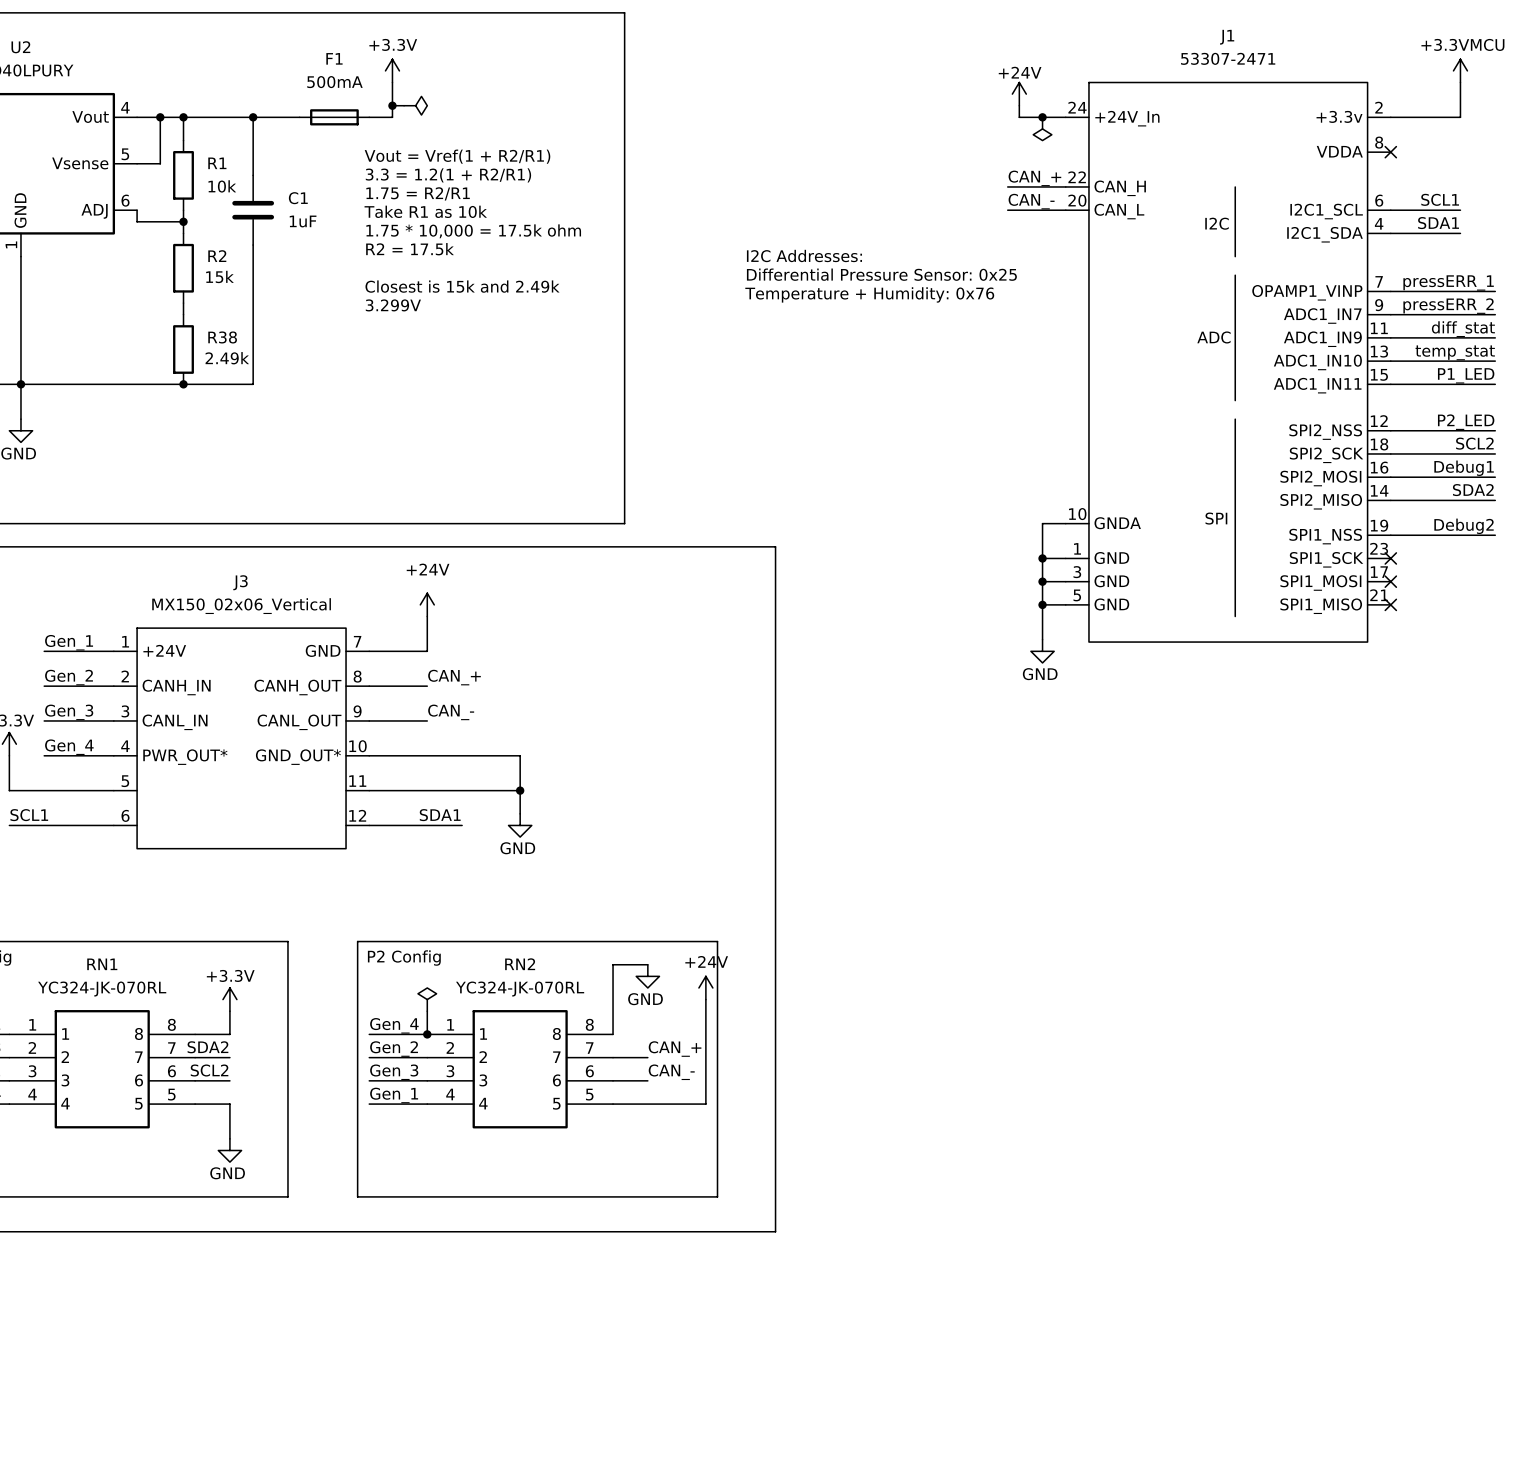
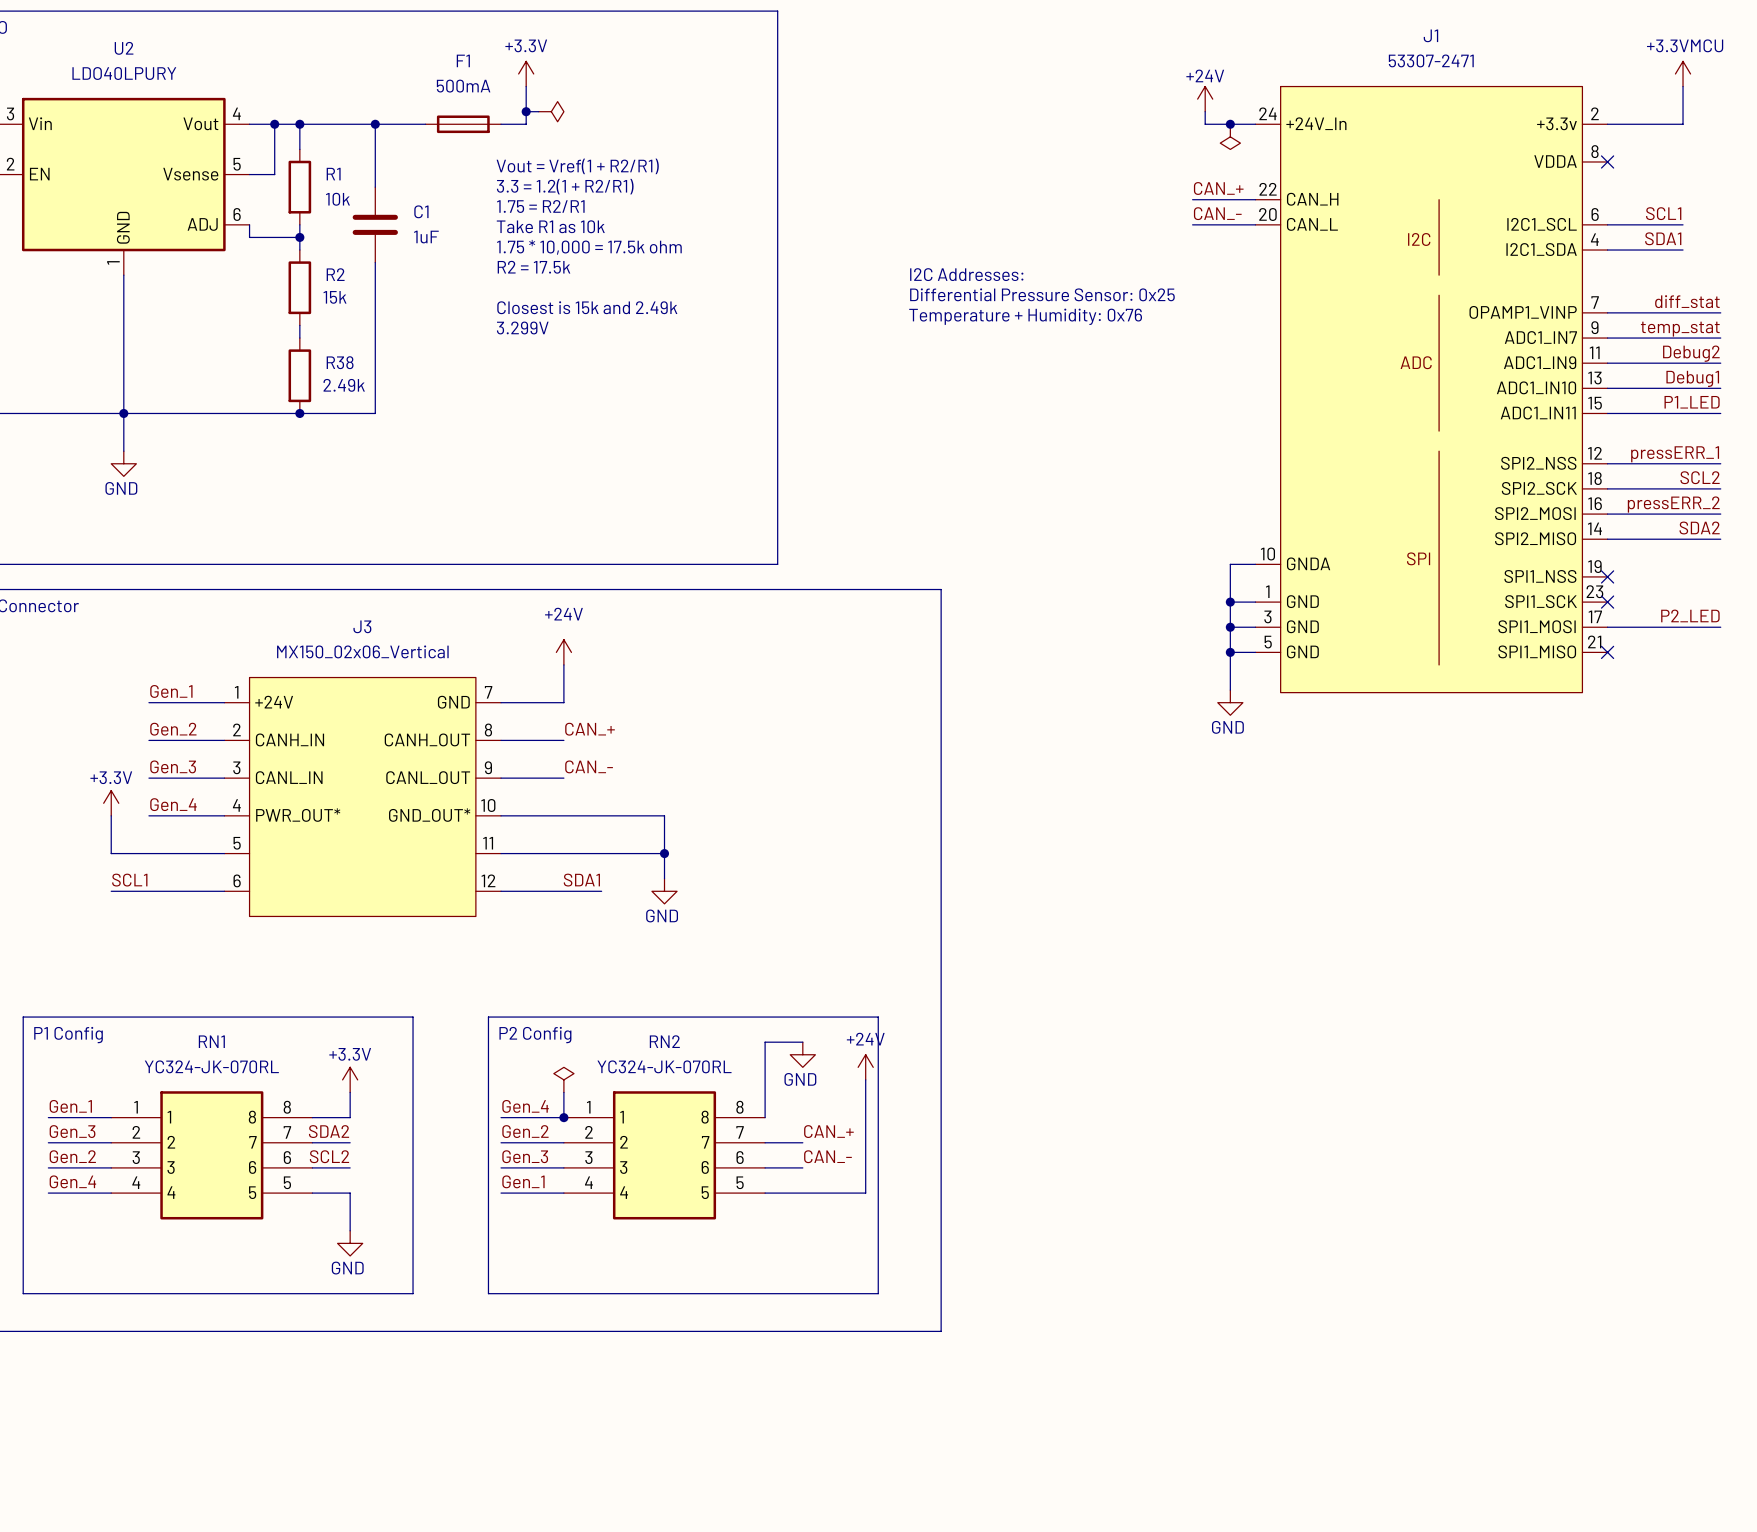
label: pressERR_1 (1448, 282) -> diff_stat (1687, 301)
label: pressERR_2 (1448, 306) -> temp_stat (1680, 329)
label: diff_stat (1463, 329) -> Debug2 (1691, 353)
label: temp_stat (1455, 352) -> Debug1 (1692, 378)
label: P2_LED (1466, 422) -> pressERR_1 (1675, 454)
label: Debug1 (1464, 468) -> pressERR_2 (1673, 504)
label: Debug2 (1464, 526) -> none
wire: (1390, 535) (1495, 535) -> (1607, 627) (1720, 627)
label: none -> P2_LED (1690, 615)
no-connect mark position: (1390, 581) -> (1607, 576)

